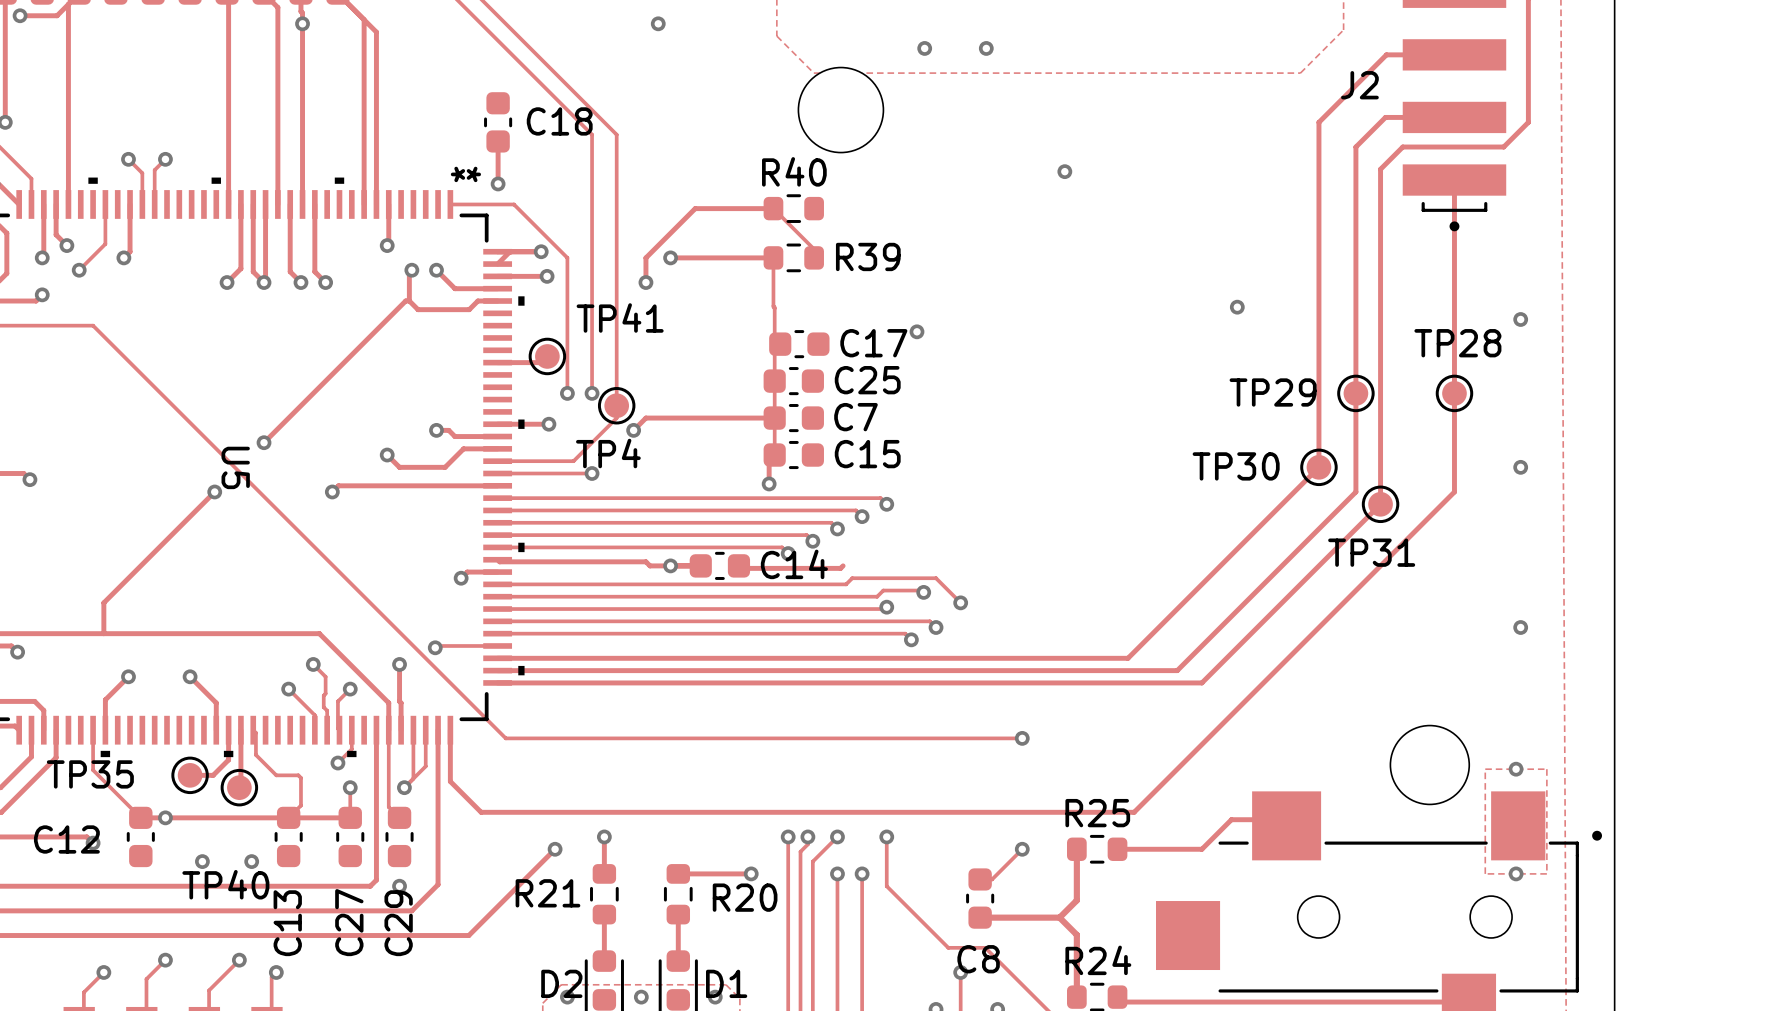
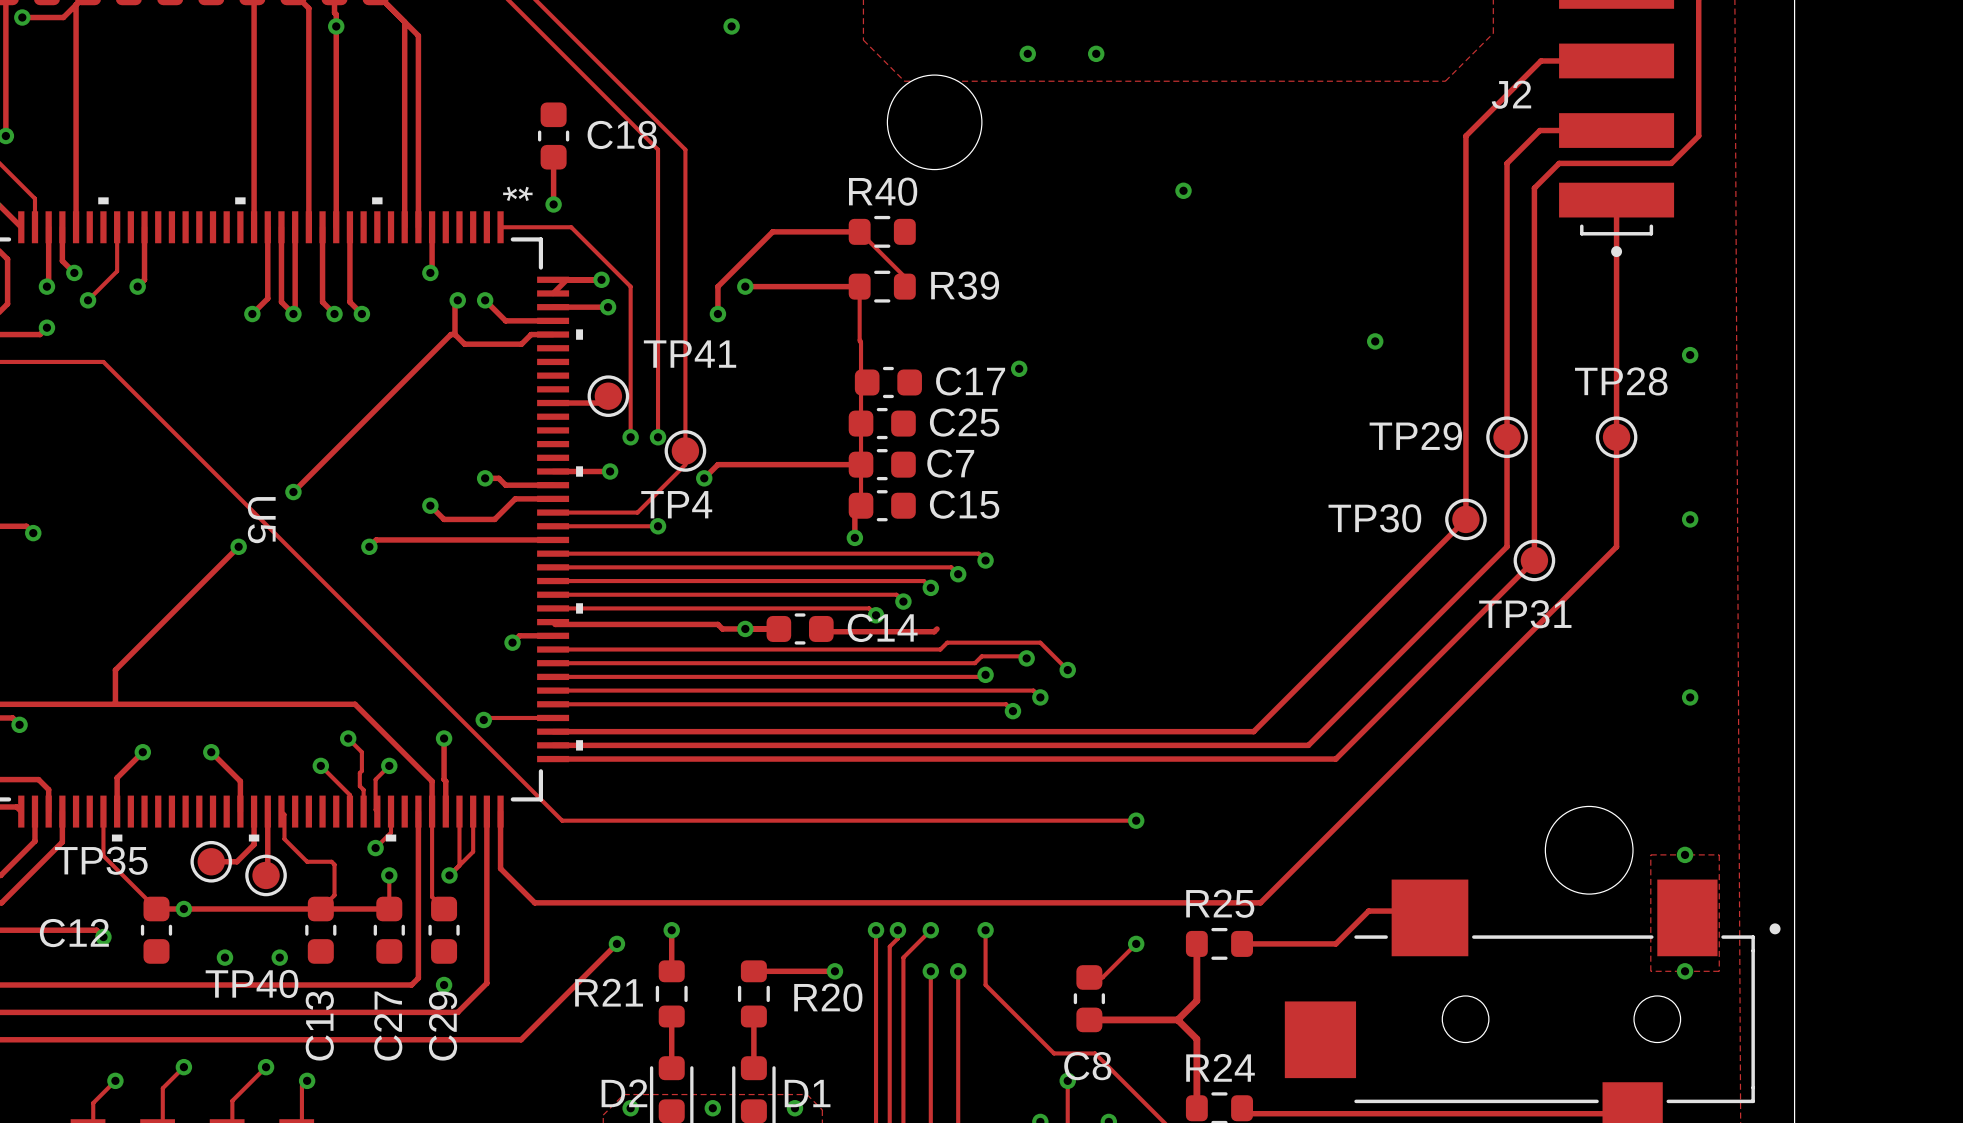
track: (128, 159) (142, 173) (142, 204) -> none
via: (128, 159) -> none
track: (165, 159) (154, 170) (154, 204) -> none
via: (165, 159) -> none

